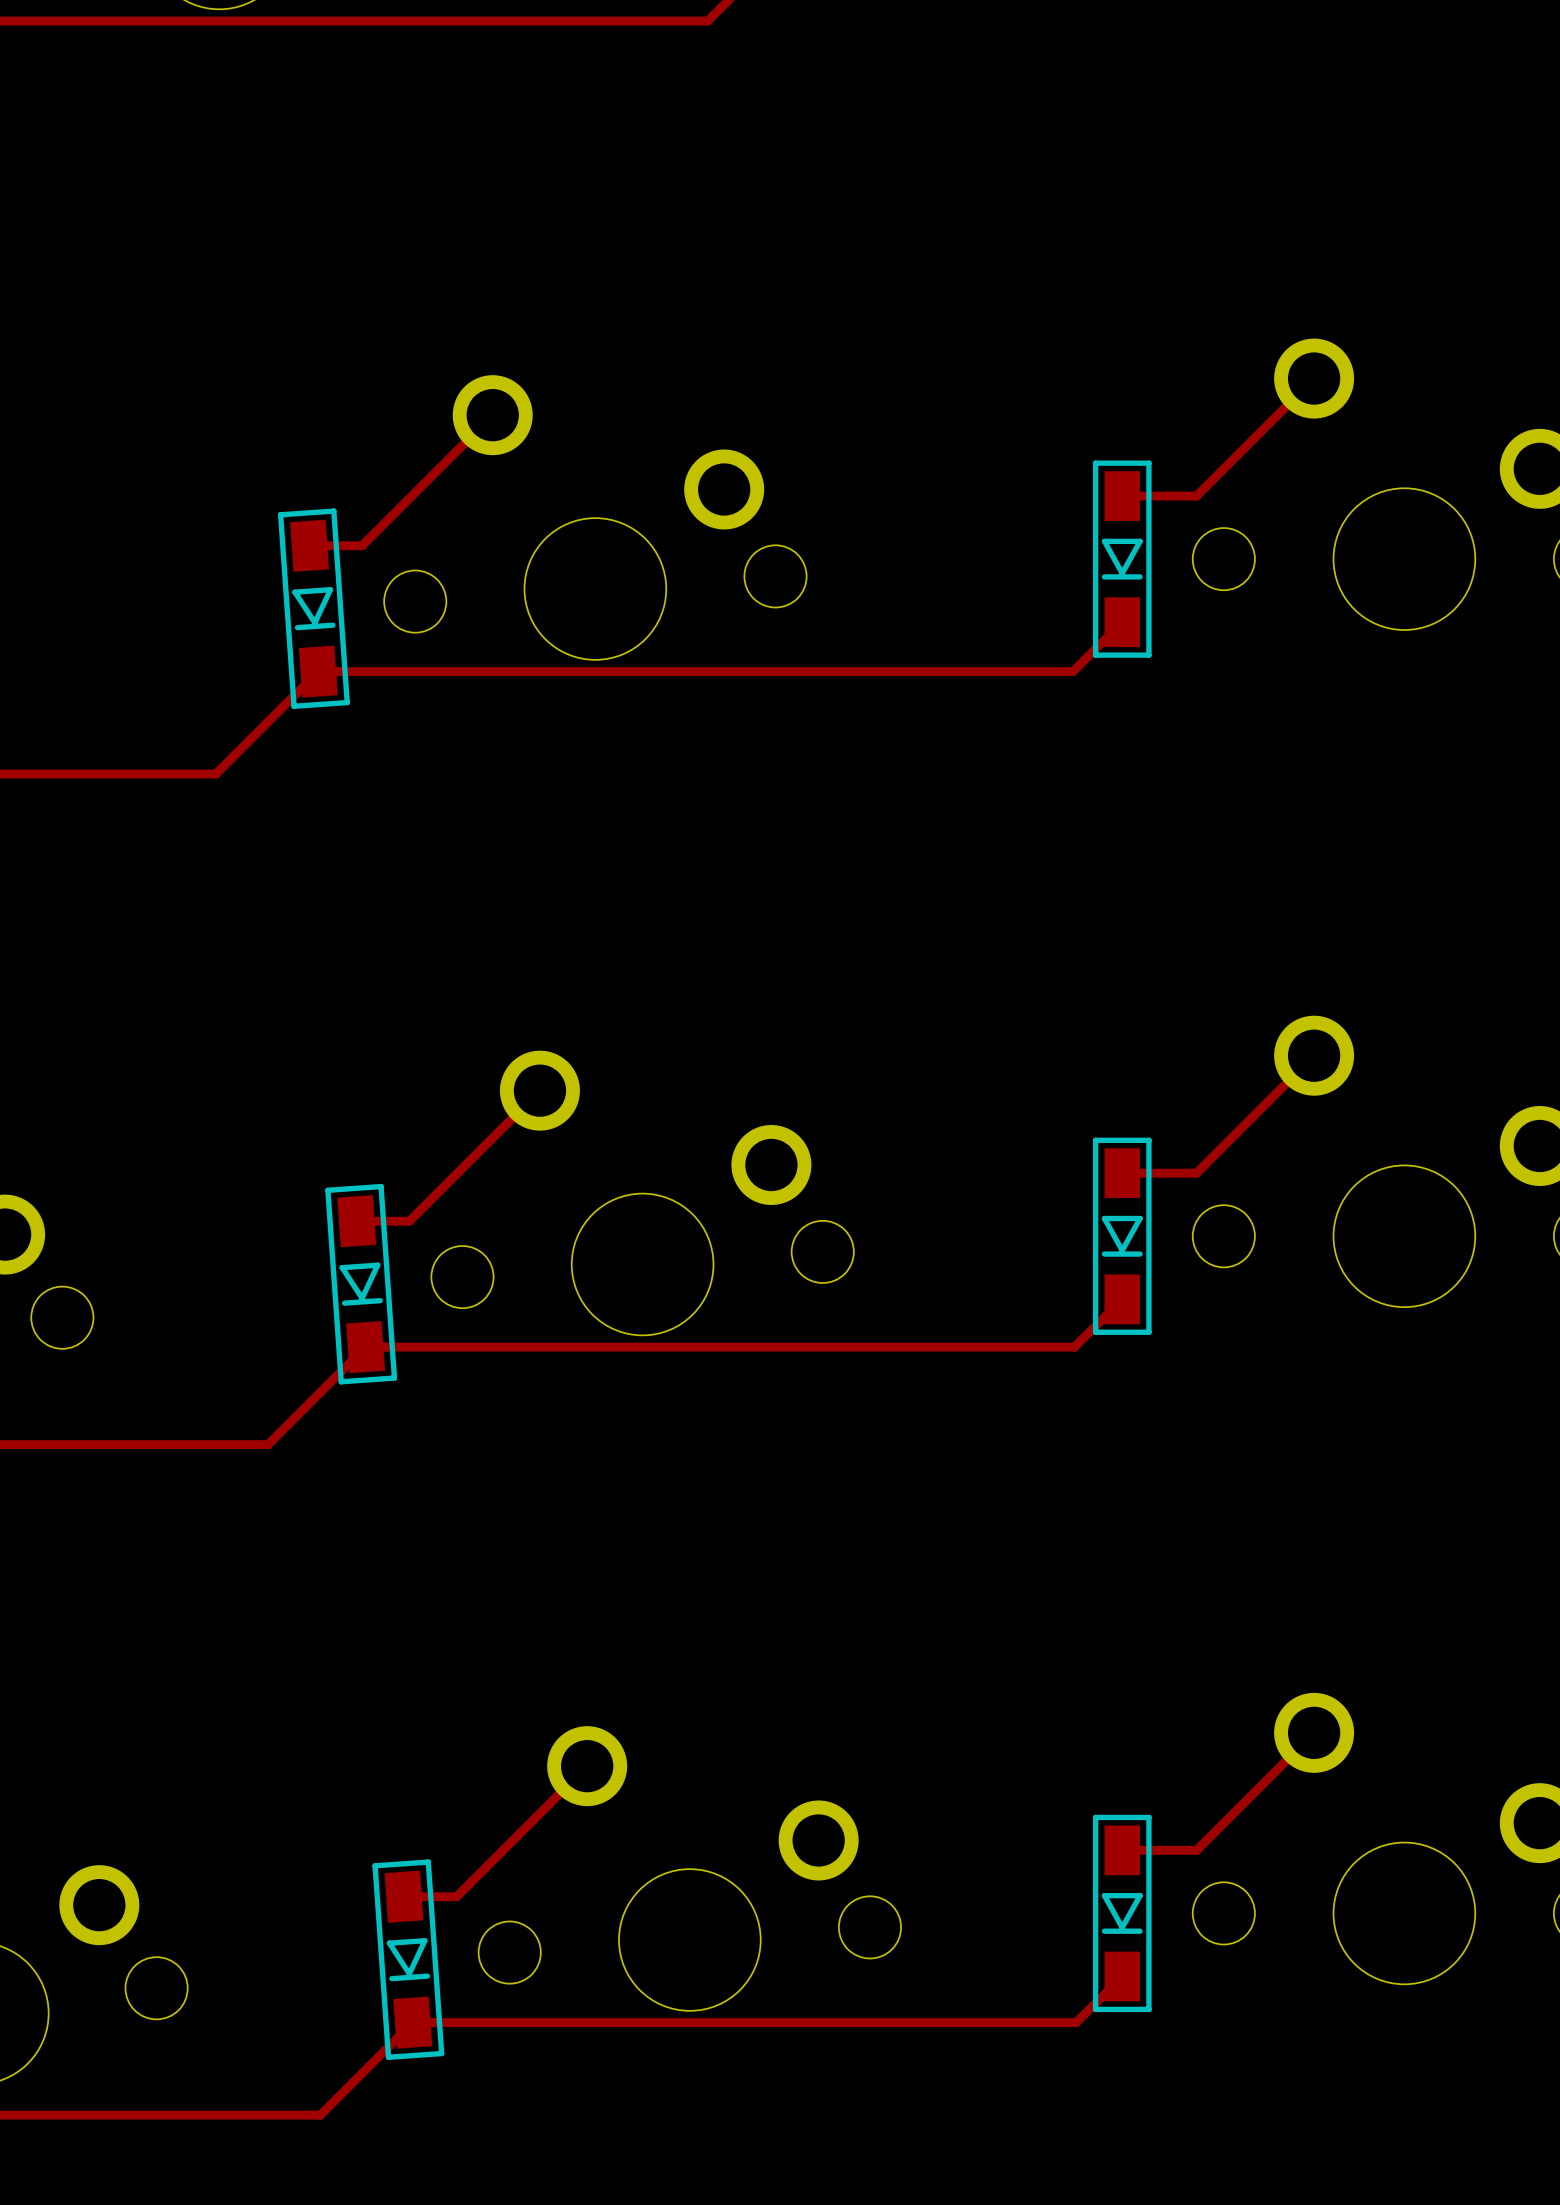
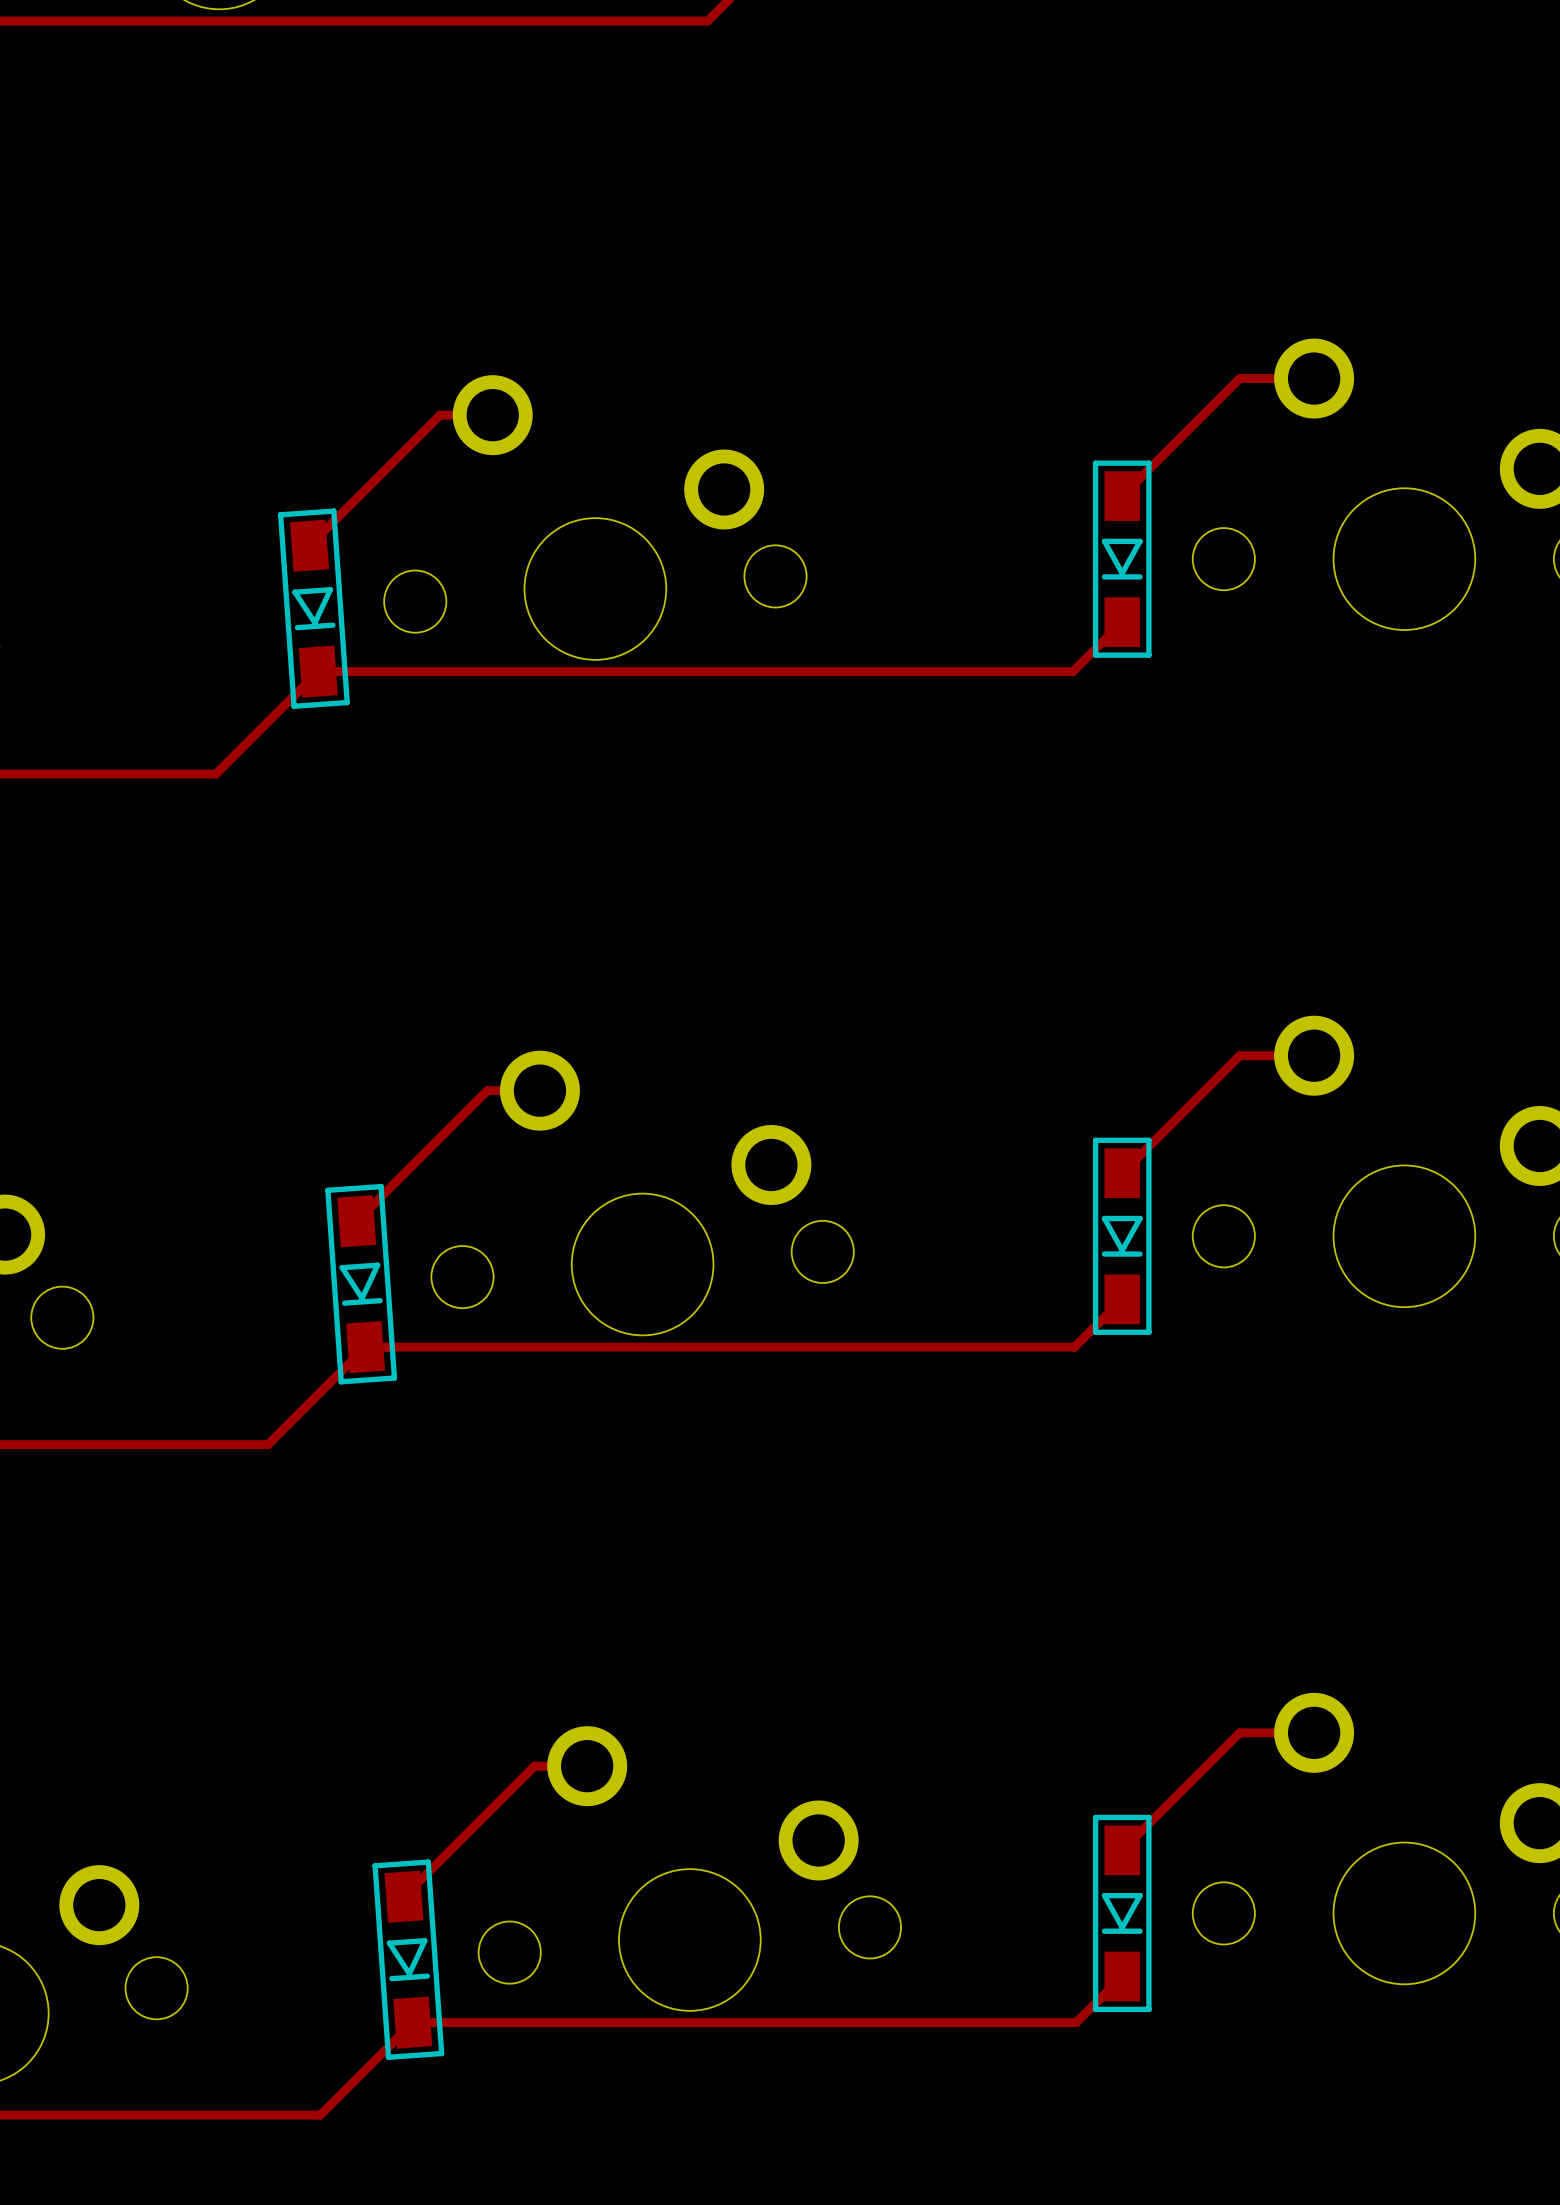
track: (1314, 378) (1196, 496) (1122, 496) -> (1314, 378) (1239, 378) (1122, 496)
track: (492, 415) (362, 545) (309, 545) -> (492, 415) (440, 415) (309, 545)
track: (1314, 1055) (1196, 1173) (1122, 1173) -> (1314, 1055) (1239, 1055) (1122, 1173)
track: (539, 1090) (409, 1221) (356, 1221) -> (539, 1090) (487, 1090) (356, 1221)
track: (1314, 1732) (1196, 1850) (1122, 1850) -> (1314, 1732) (1239, 1732) (1122, 1850)
track: (587, 1766) (456, 1896) (403, 1896) -> (587, 1766) (534, 1766) (403, 1896)

